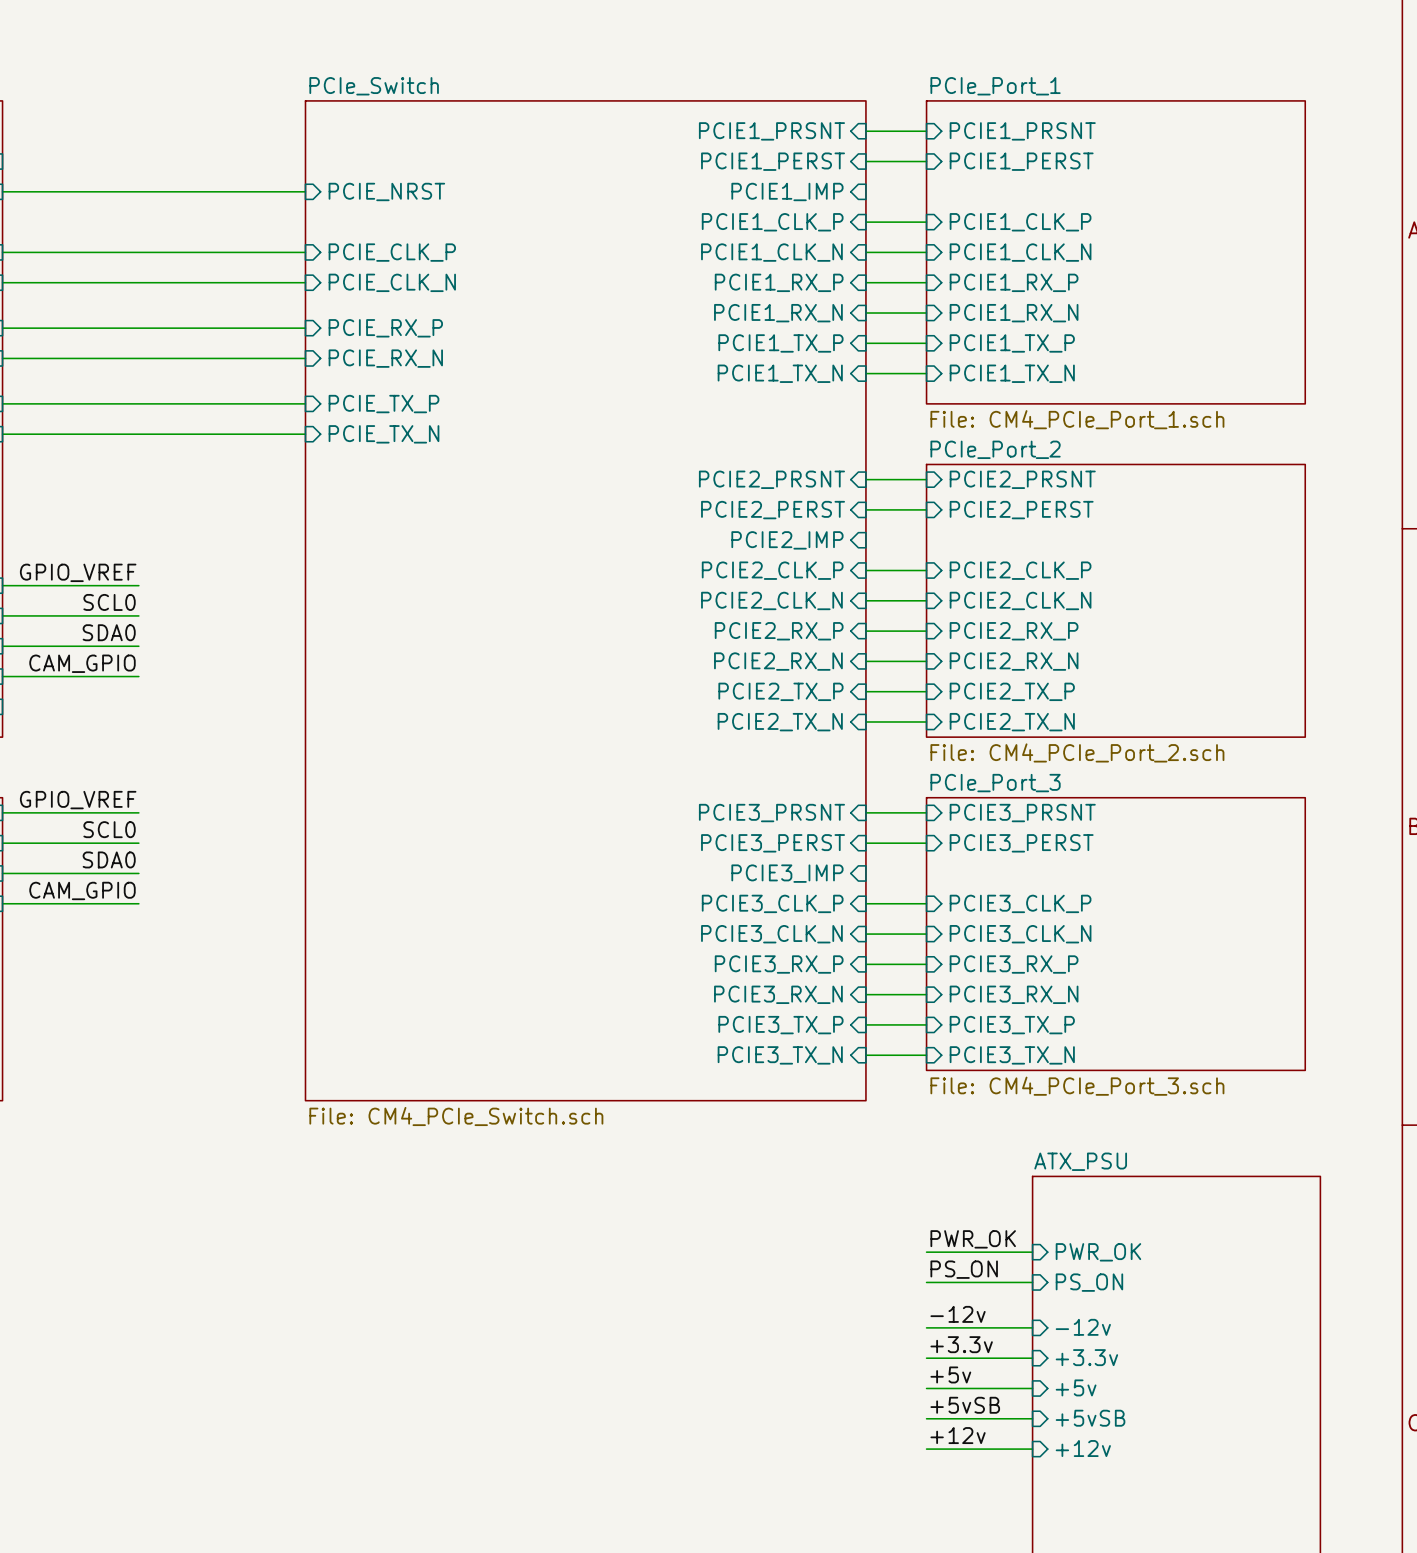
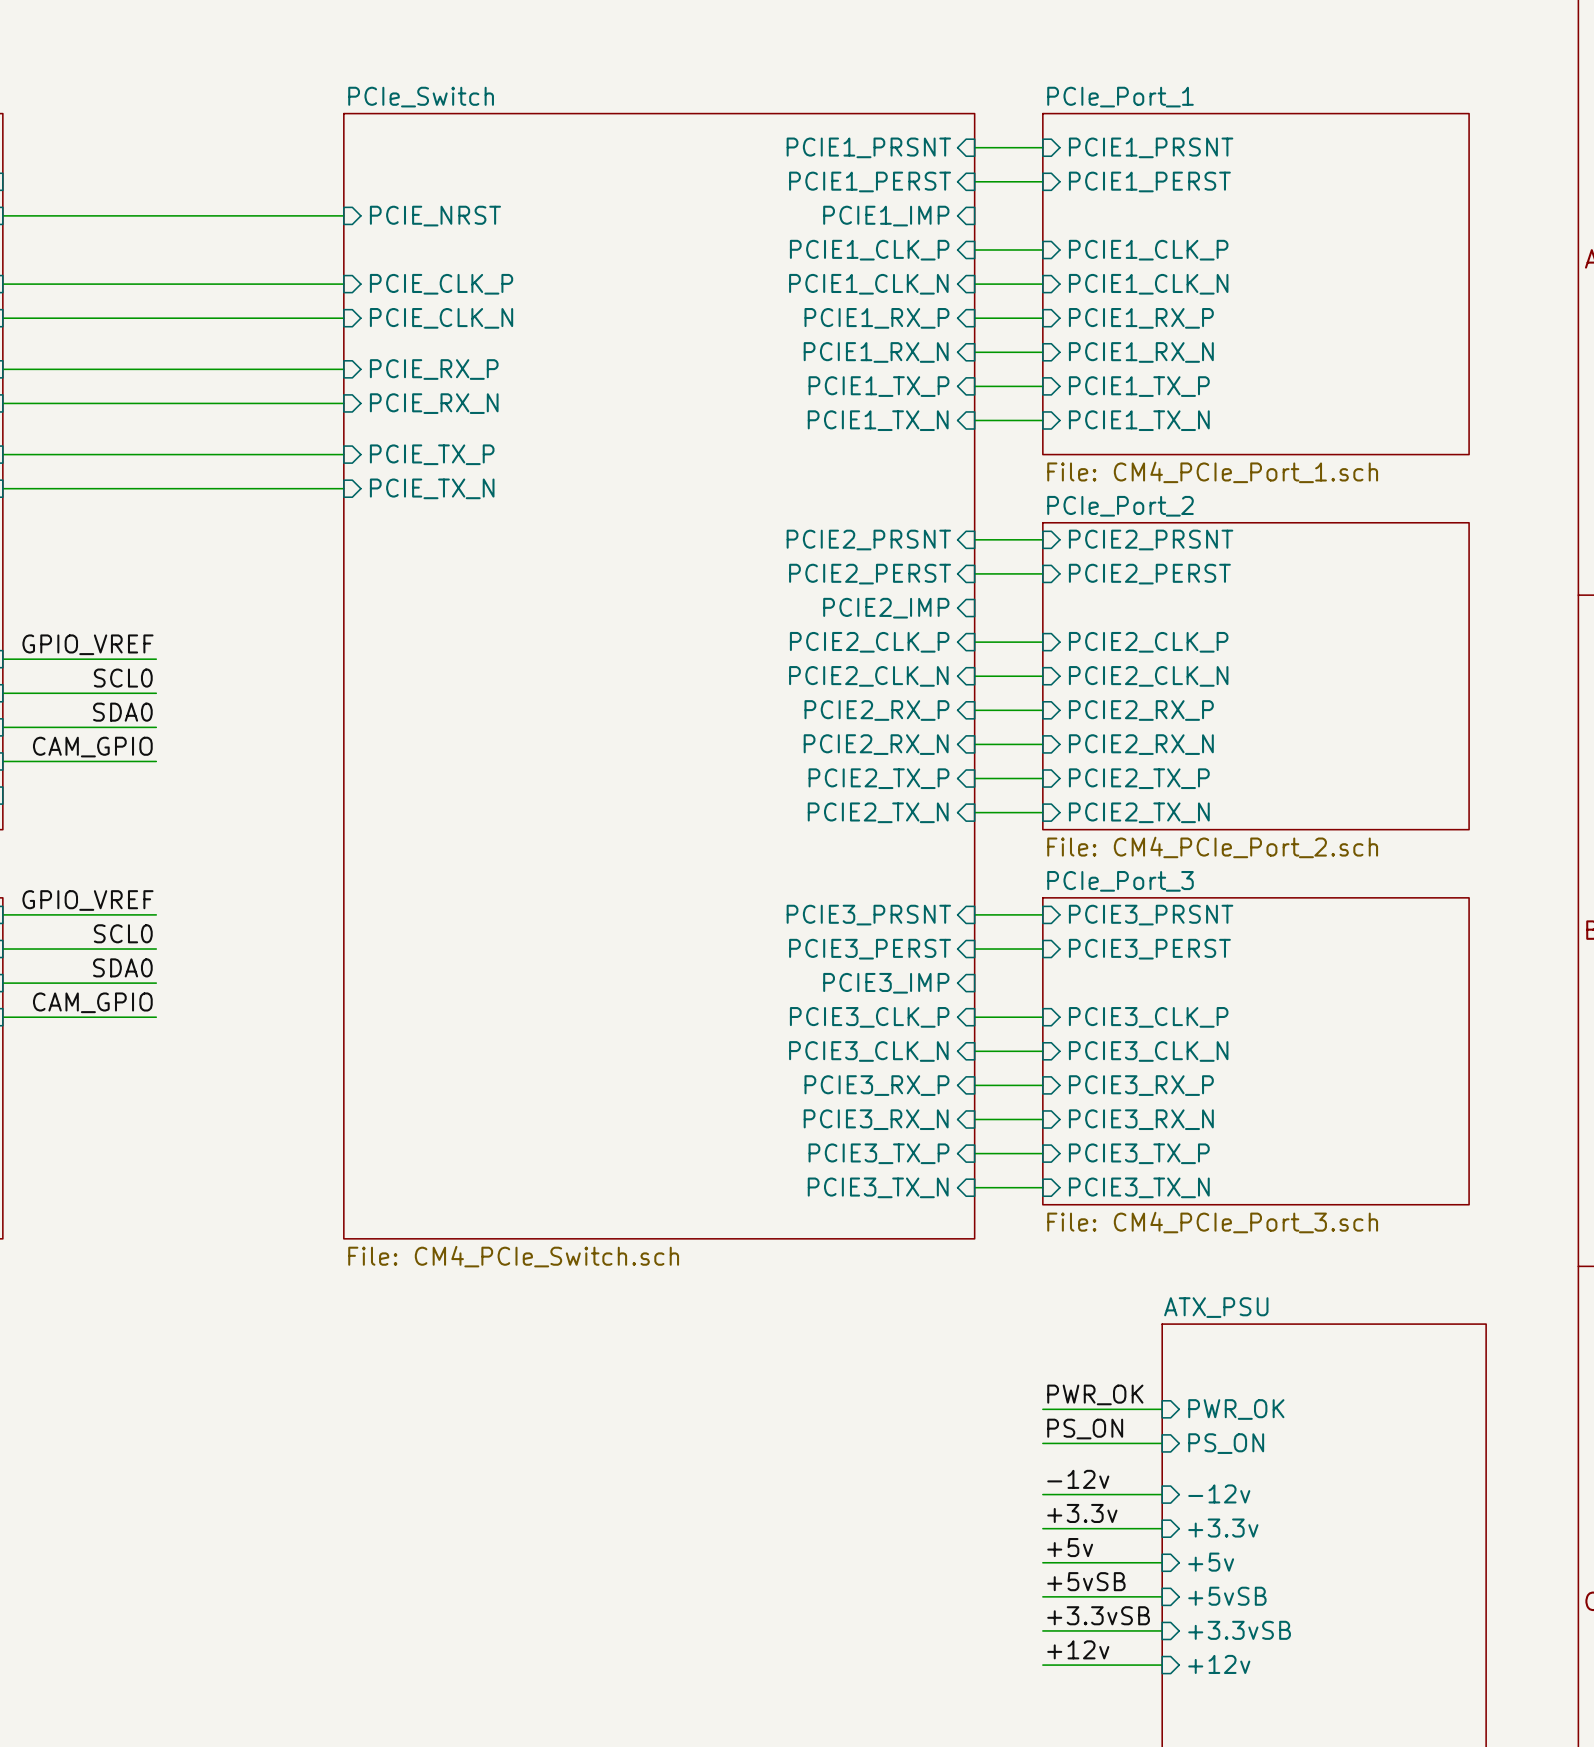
label: +12v (958, 1435) -> +3.3vSB (1098, 1615)
sheet pin: +12v (1083, 1448) -> +3.3vSB (1239, 1630)
label: none -> +12v (1078, 1649)
sheet pin: none -> +12v (1219, 1664)
wire: none -> (1042, 1665) (1162, 1665)

